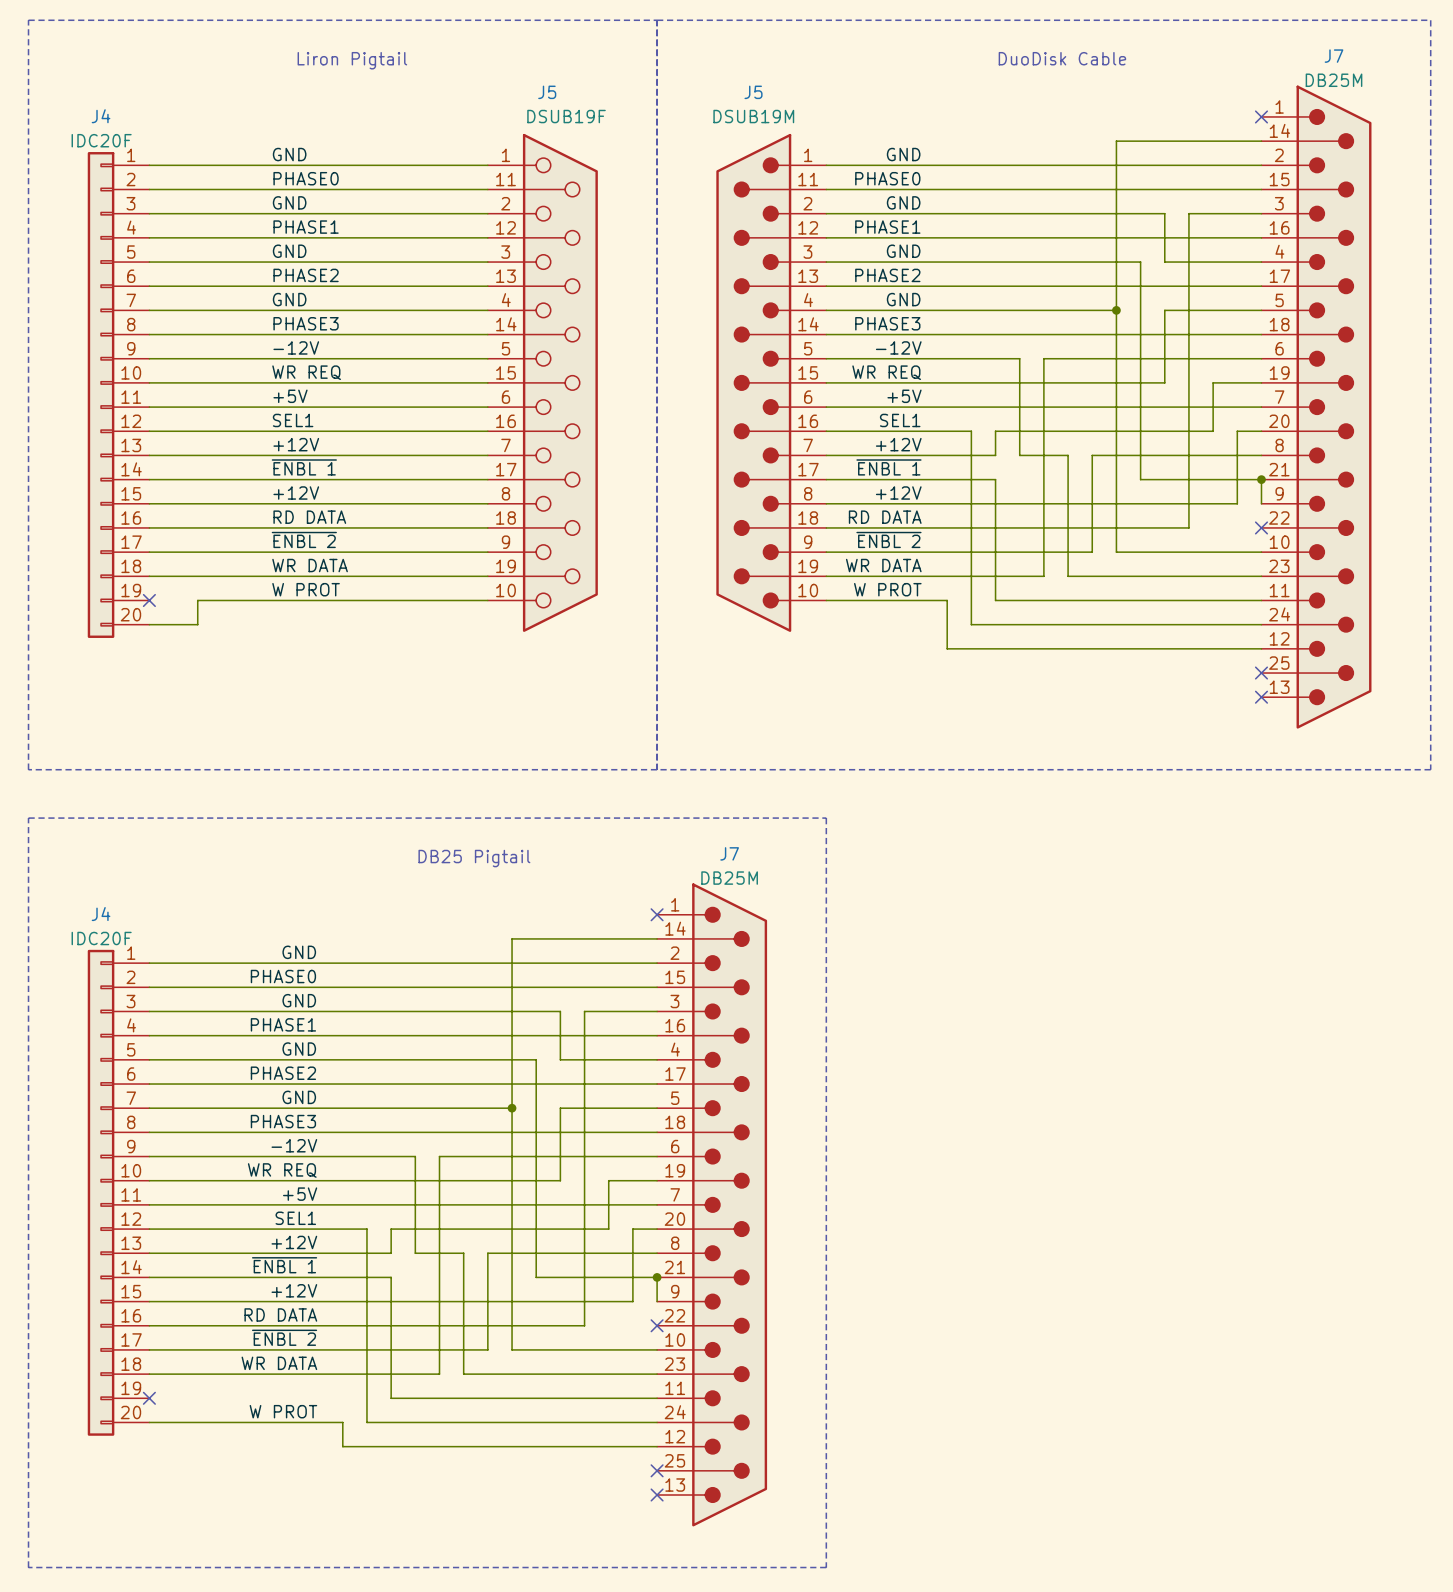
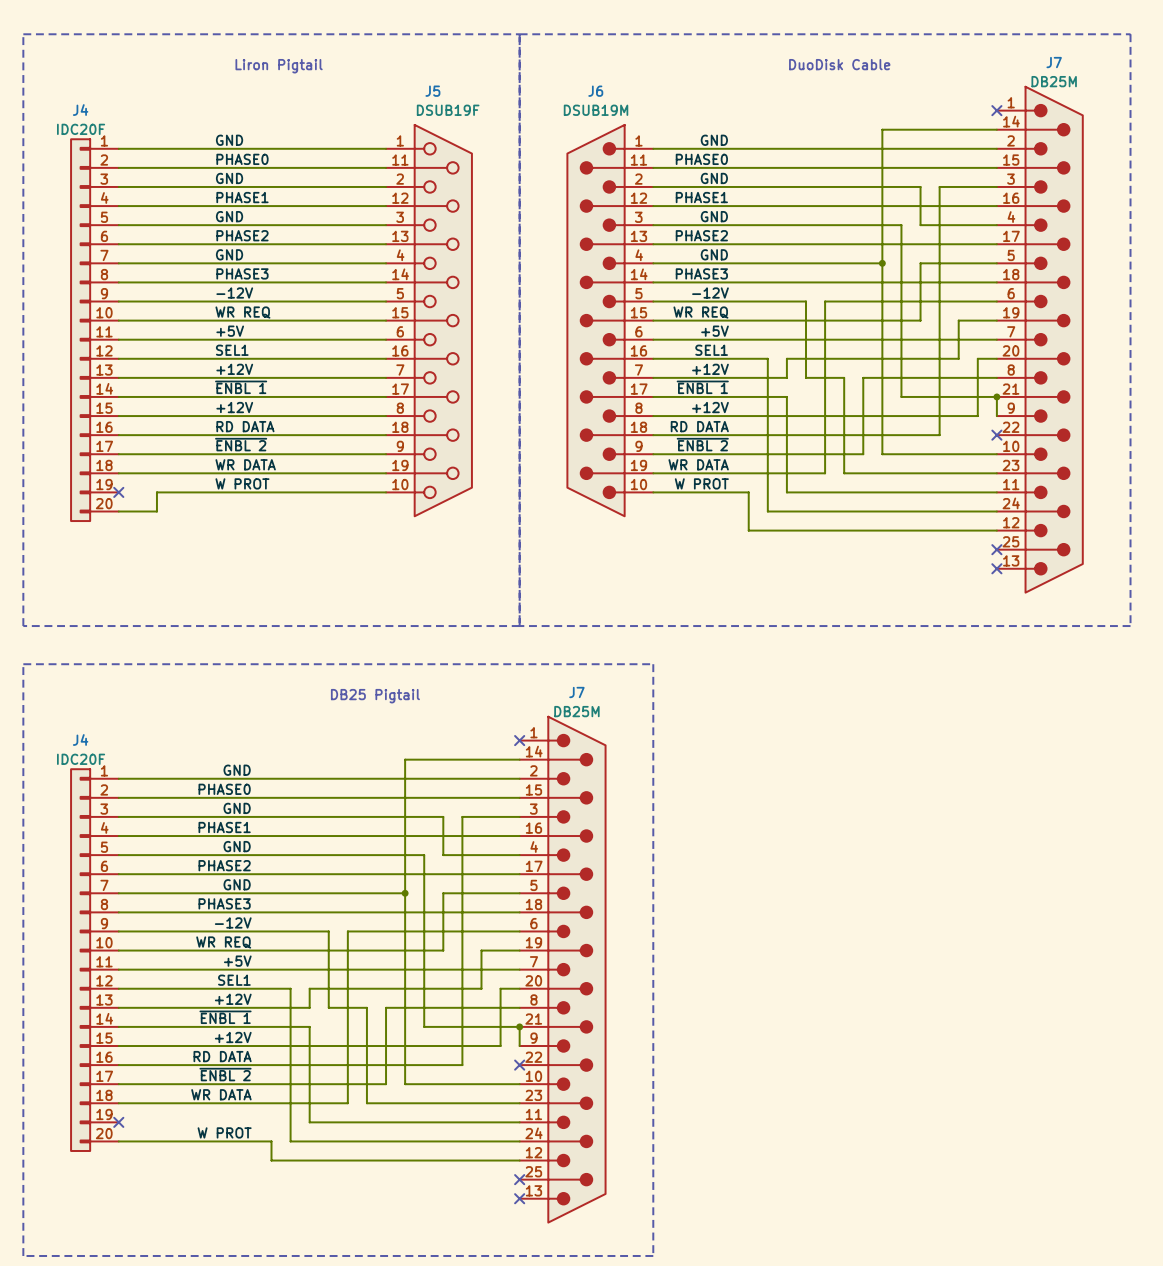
J5 name: J5 (753, 92) -> J6 (595, 91)

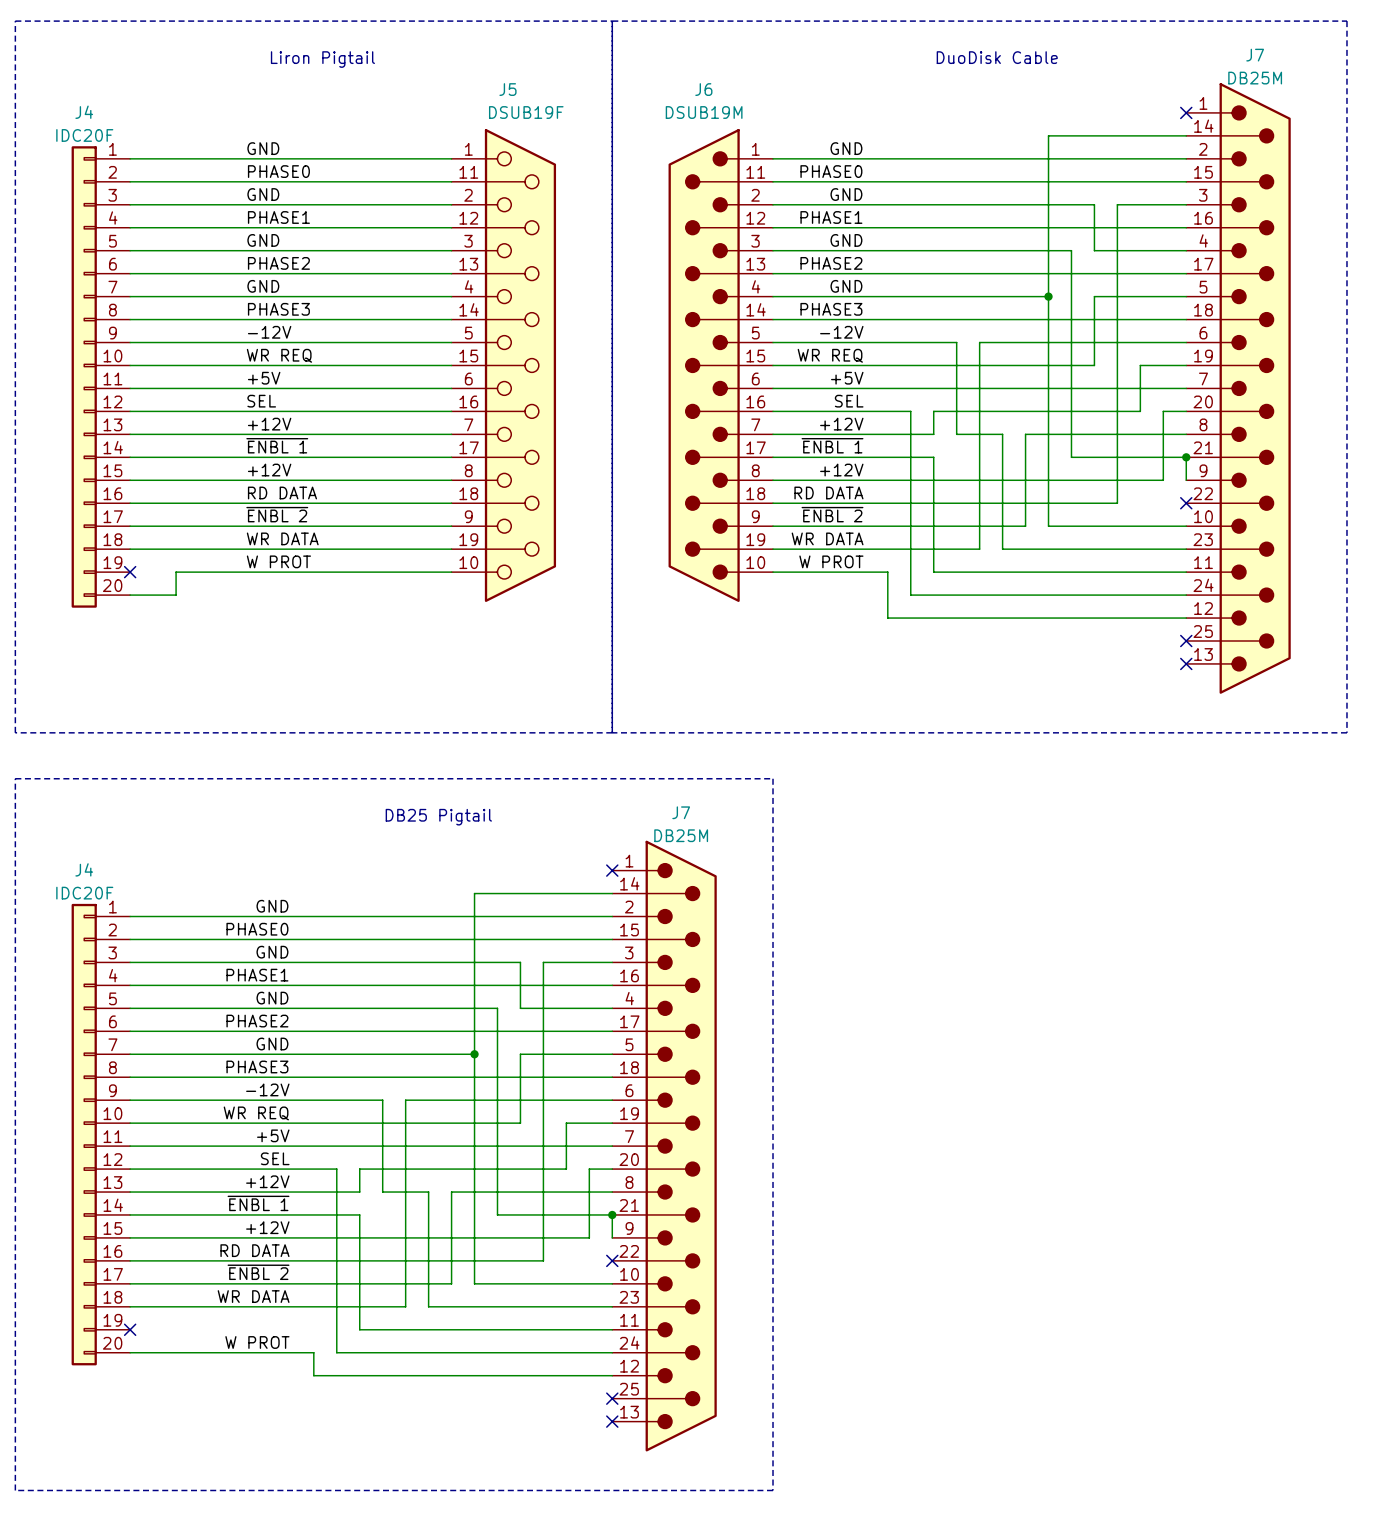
label: SEL1 (232, 350) -> SEL (261, 401)
label: SEL1 (711, 350) -> SEL (849, 401)
label: SEL1 (234, 980) -> SEL (275, 1158)

